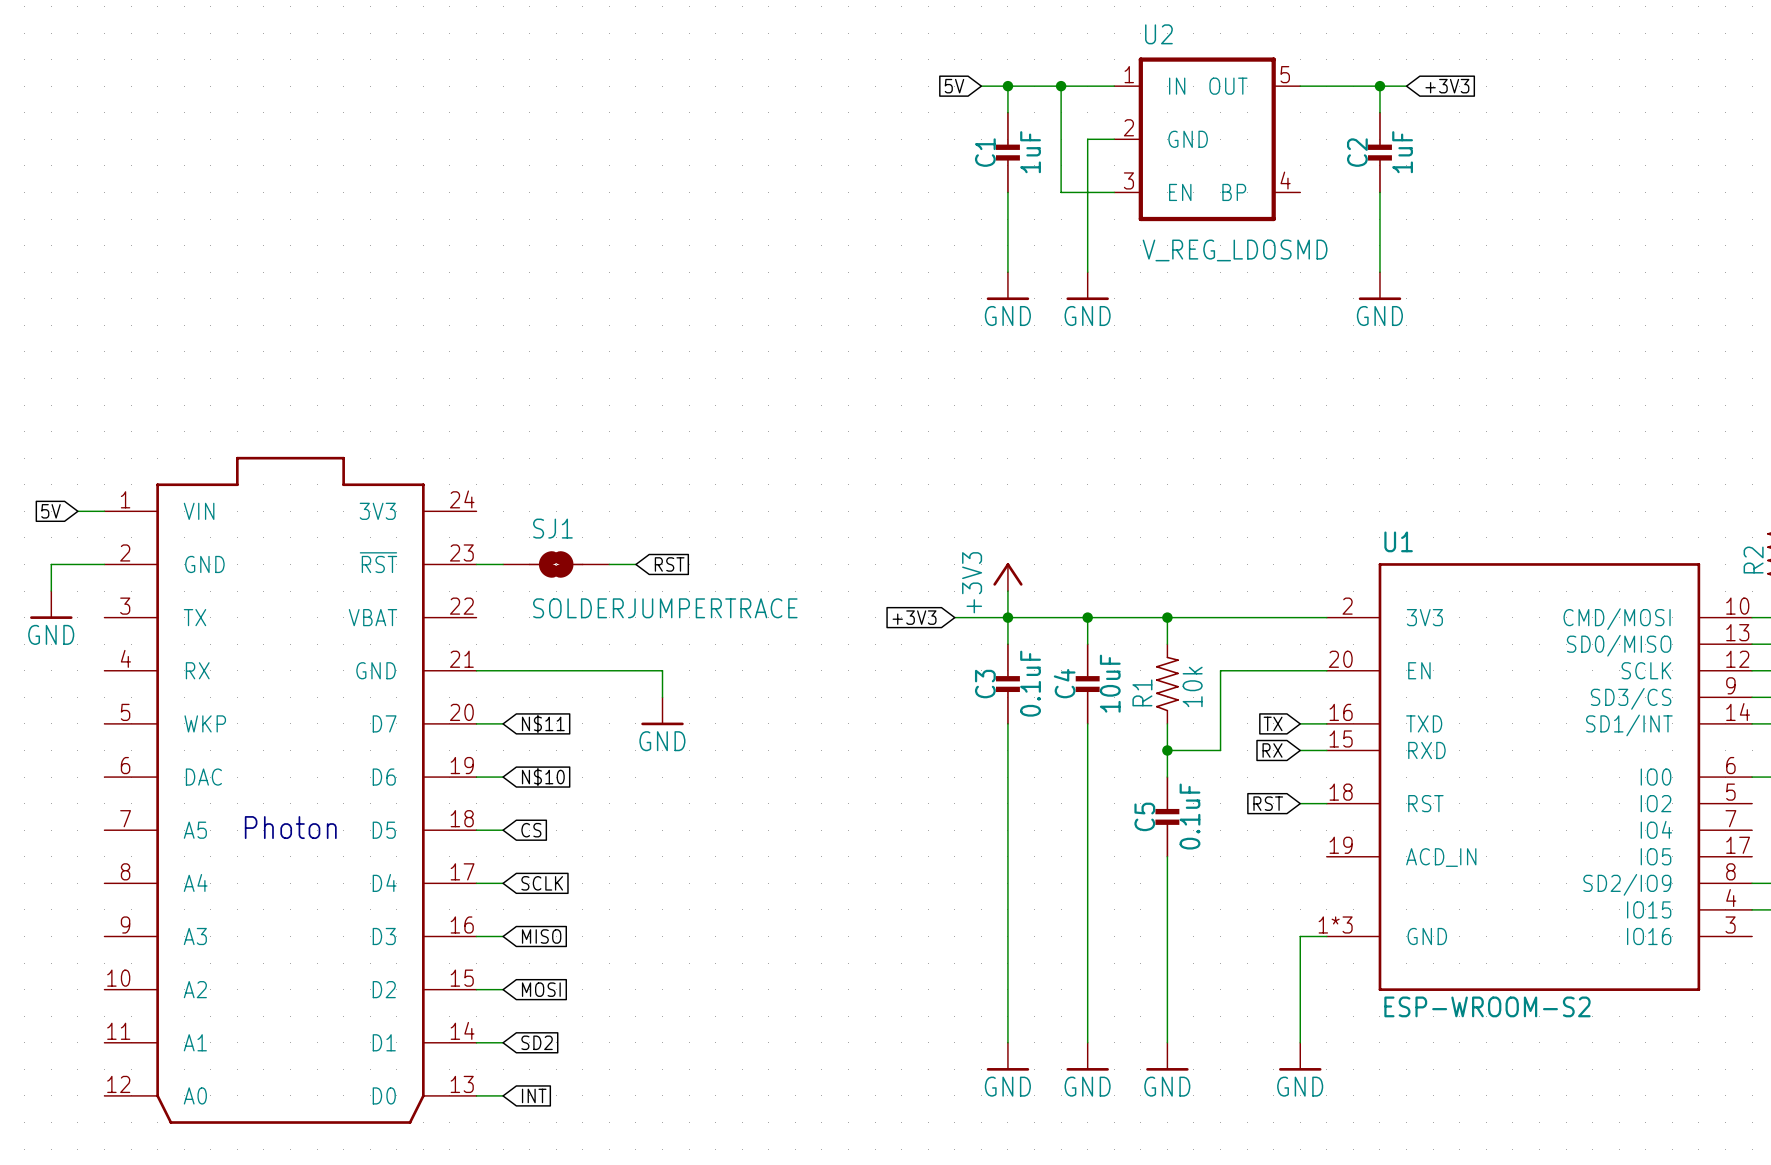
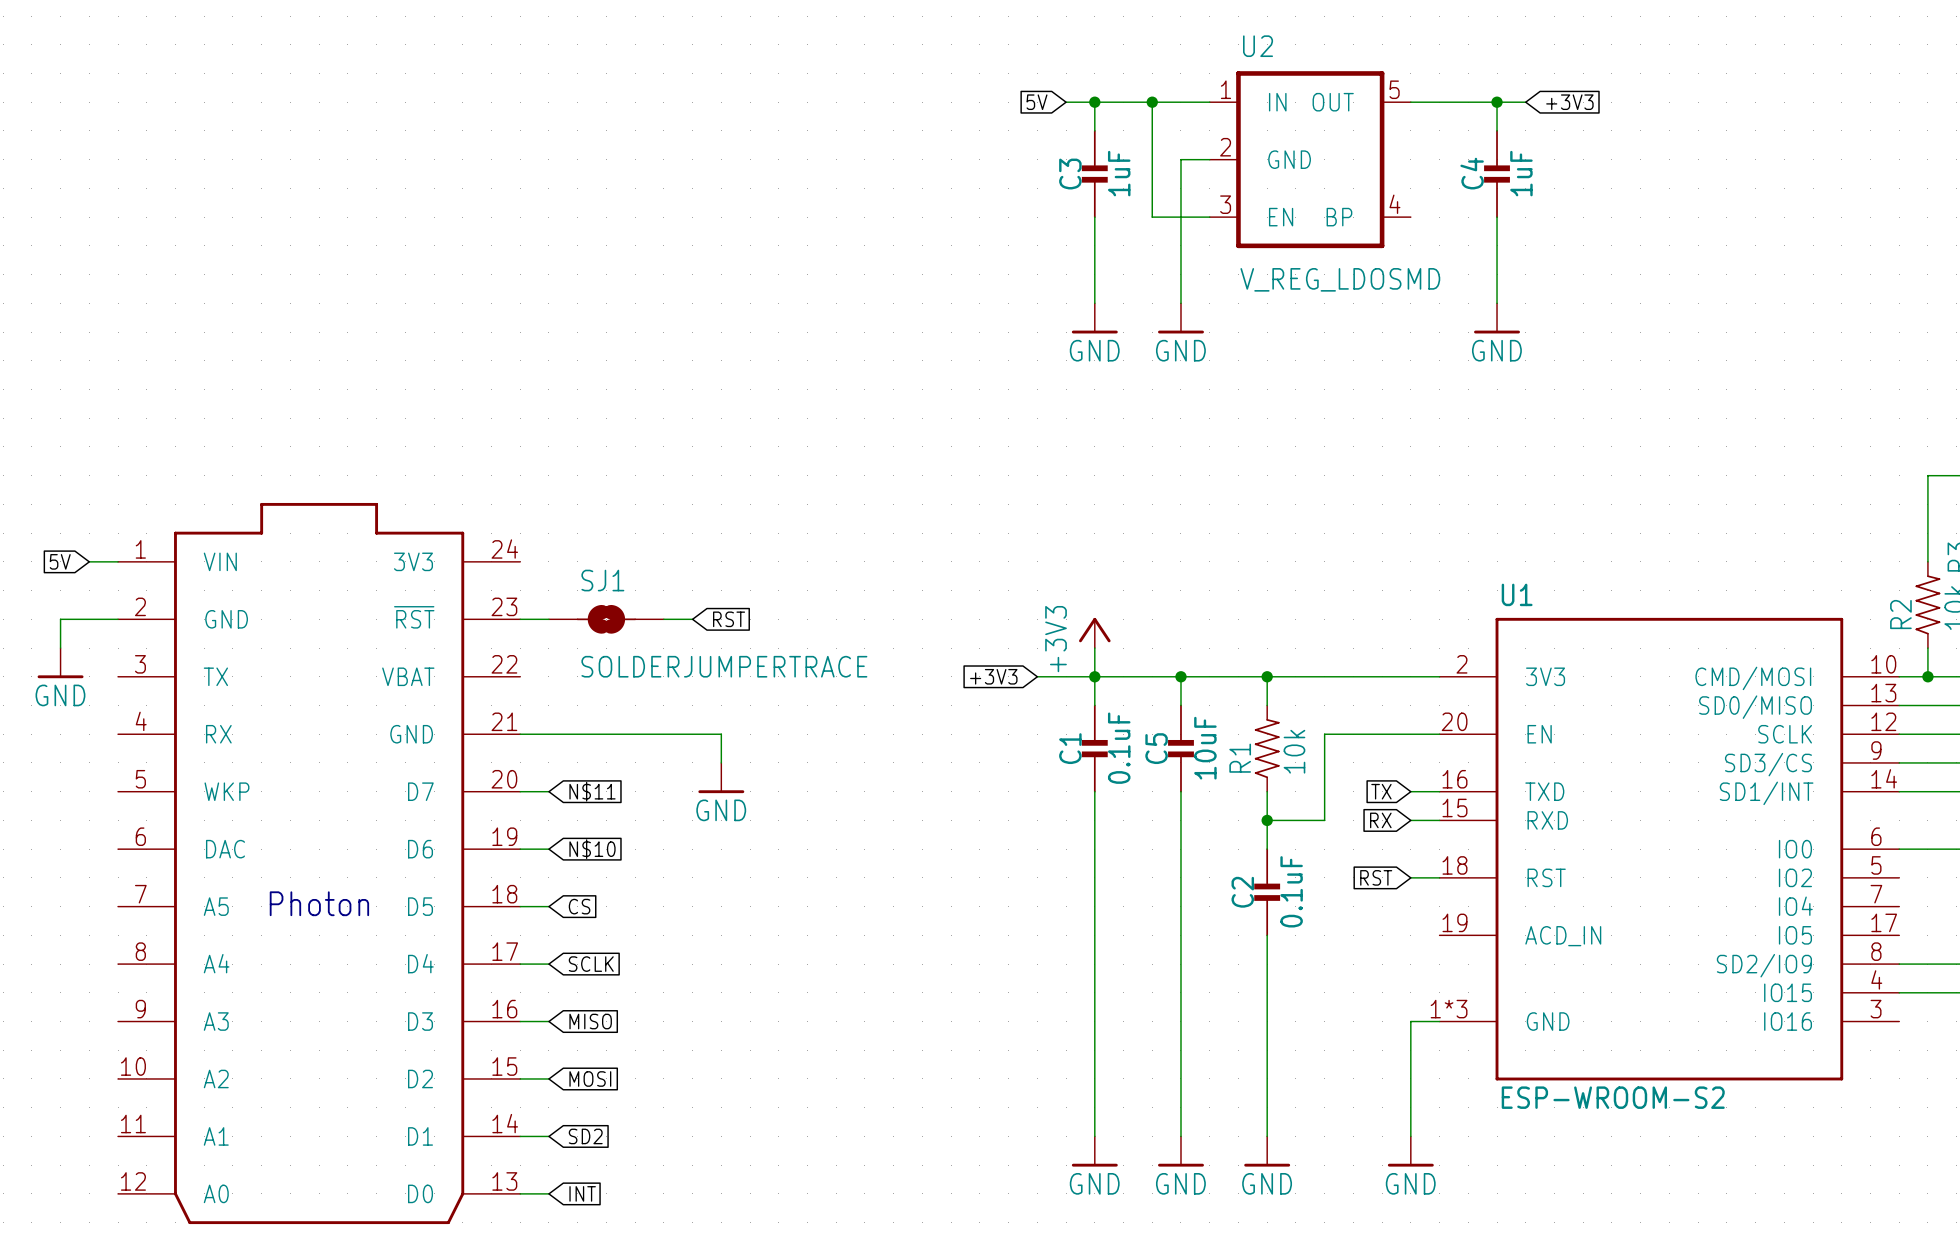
C1 name: C1 (985, 152) -> C3 (1070, 174)
C2 name: C2 (1357, 152) -> C4 (1472, 173)
C4 name: C4 (1064, 683) -> C5 (1156, 748)
C3 name: C3 (985, 684) -> C1 (1070, 748)
C5 name: C5 (1144, 816) -> C2 (1242, 892)

